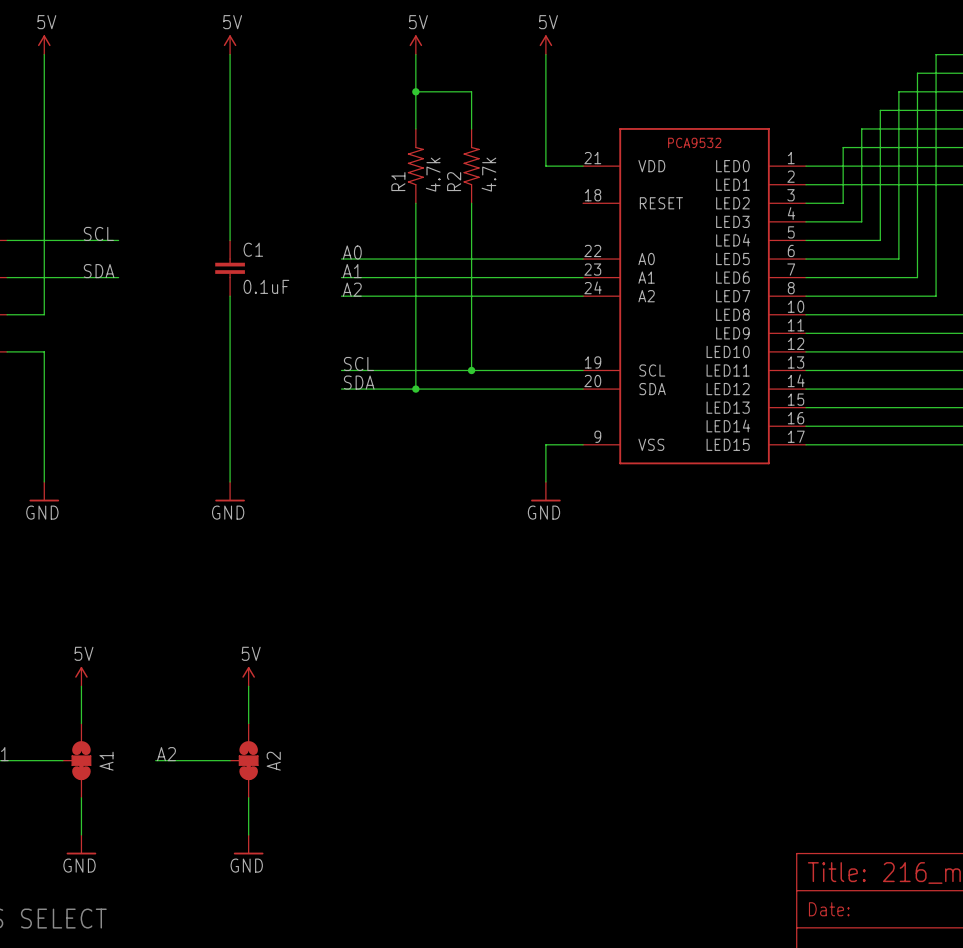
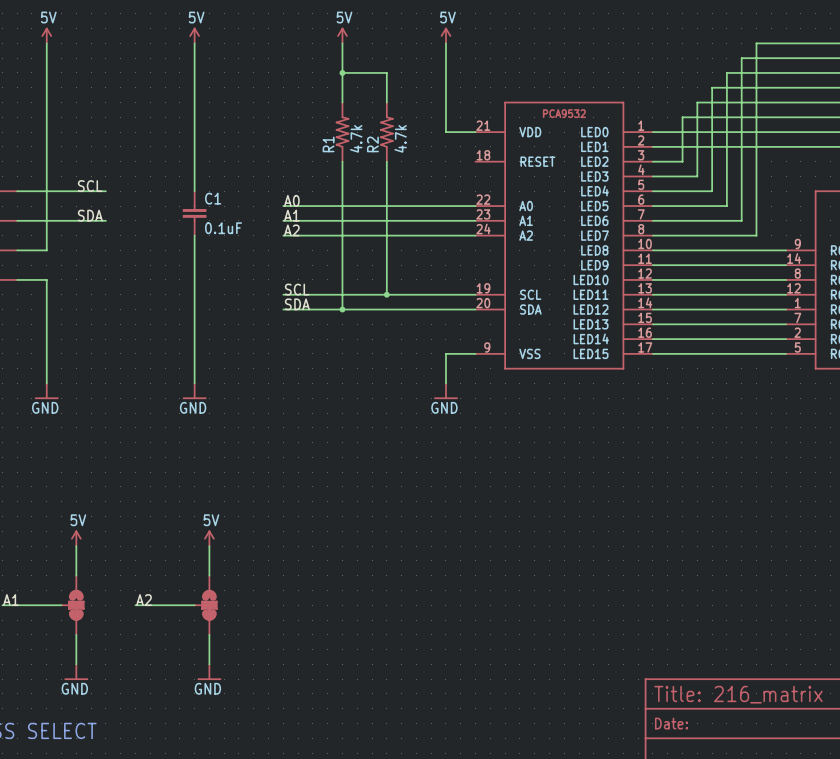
A1 name: A1 (106, 761) -> none
A2 name: A2 (273, 761) -> none

